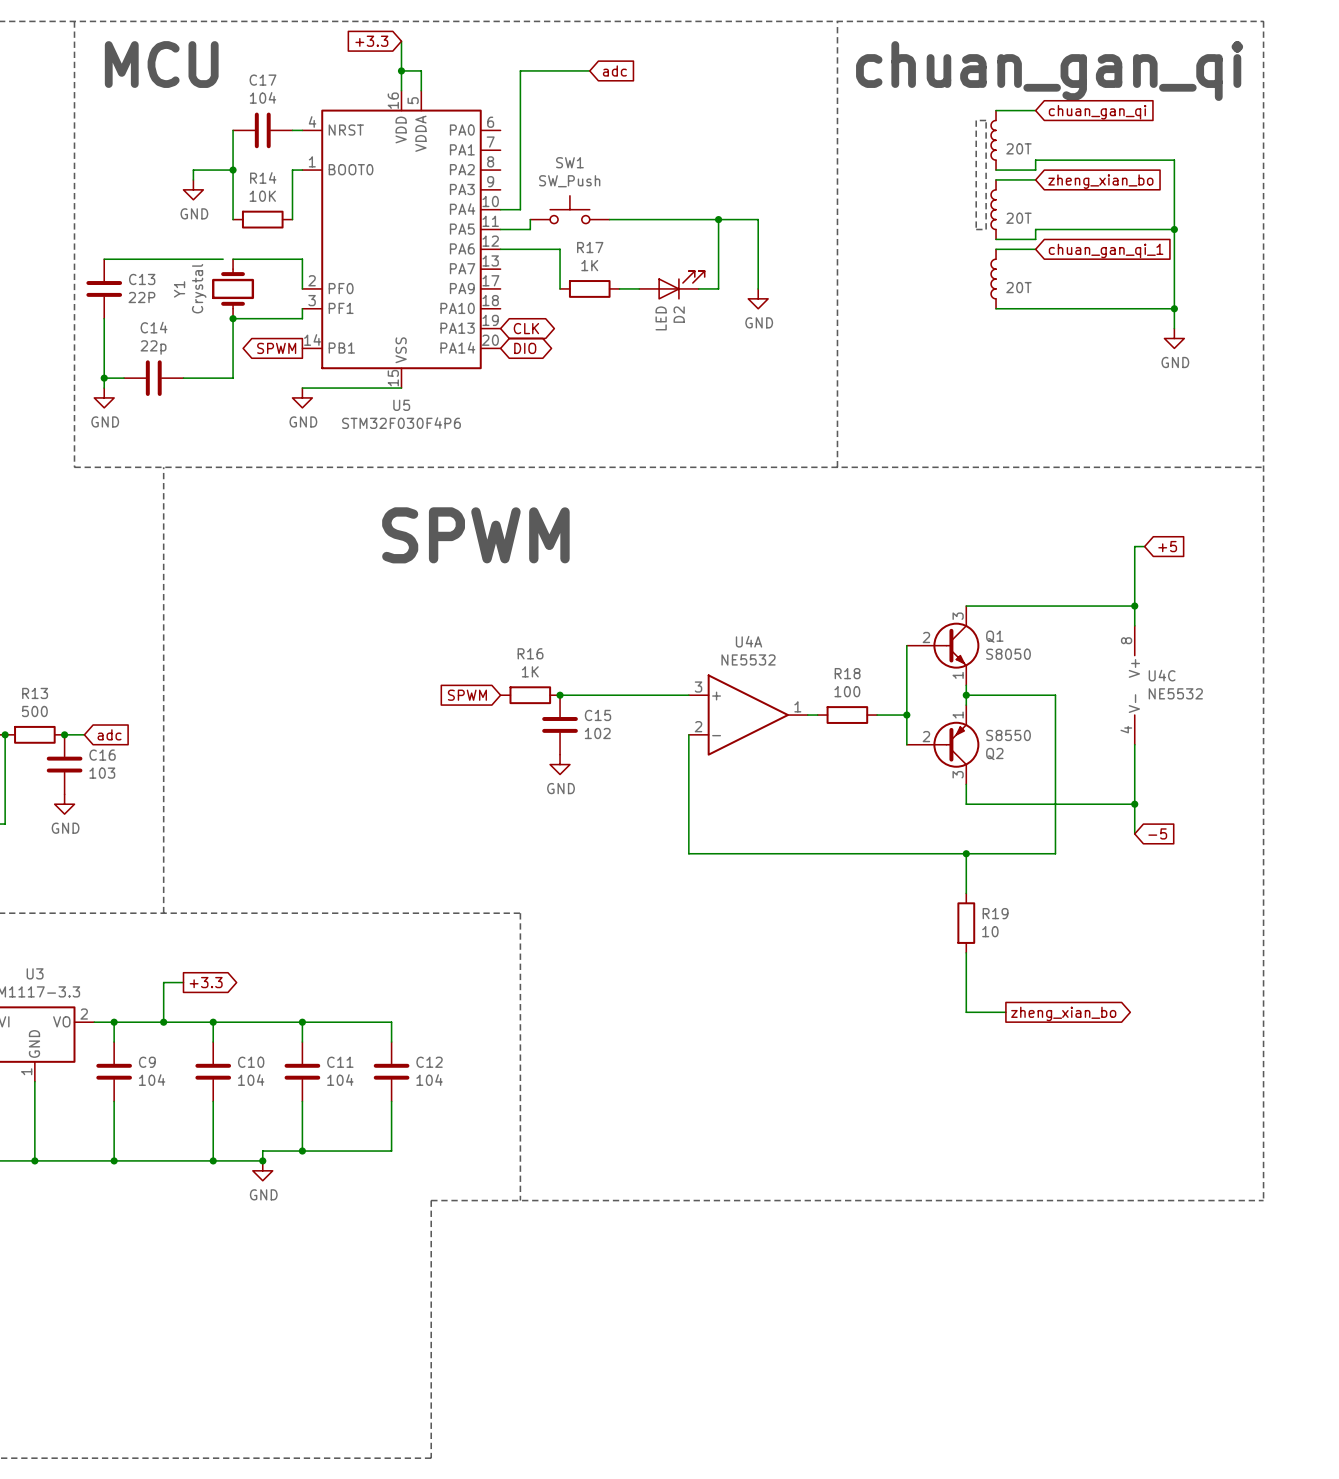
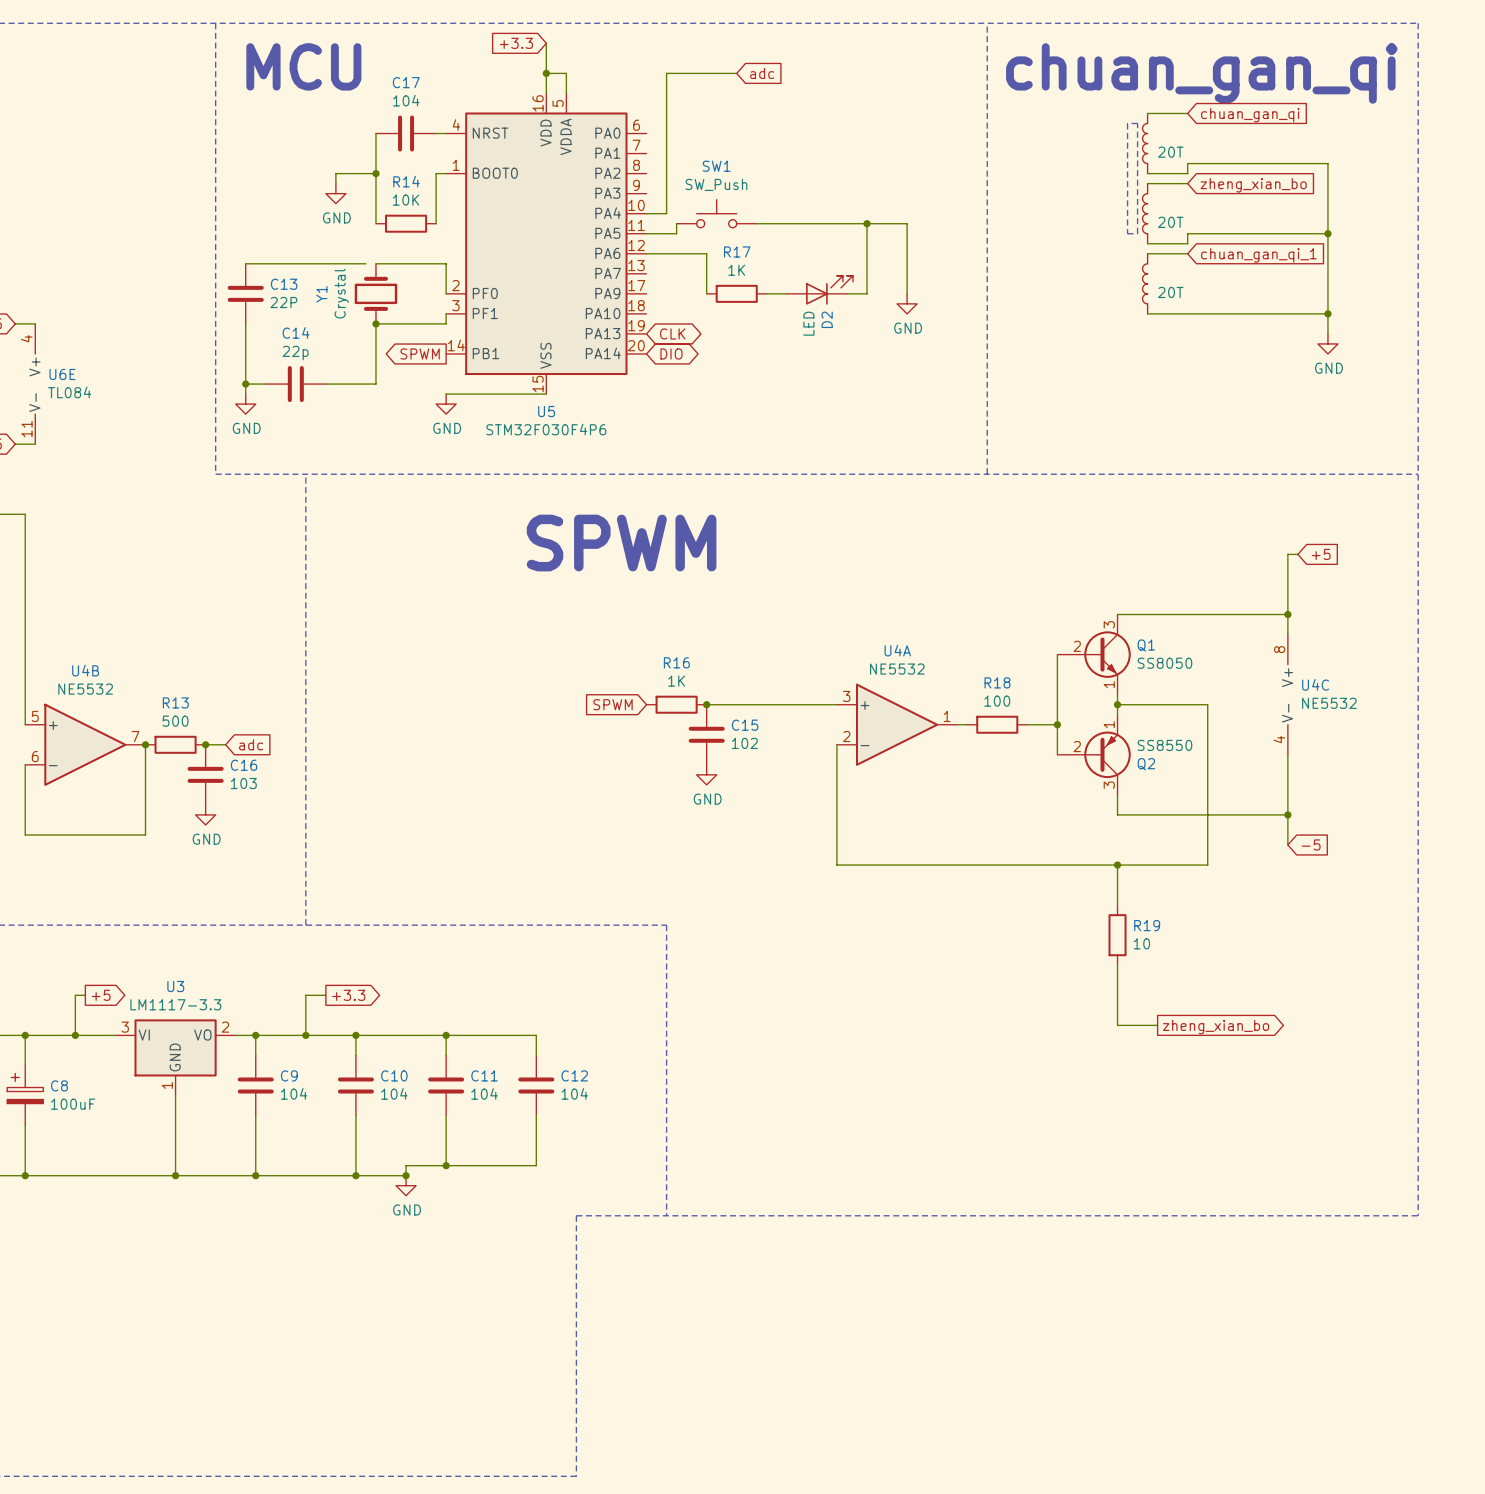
Q1 value: S8050 (1008, 654) -> SS8050 (1164, 663)
Q2 value: S8550 (1008, 735) -> SS8550 (1164, 745)

